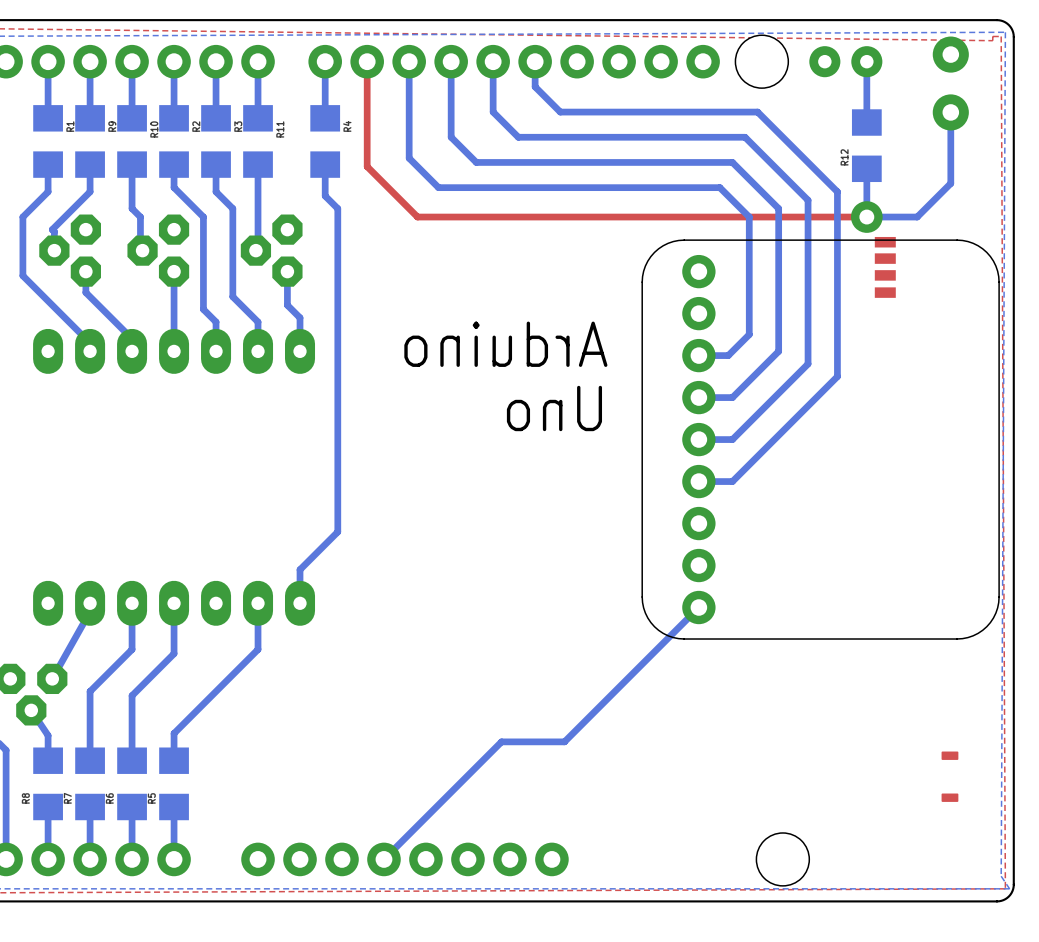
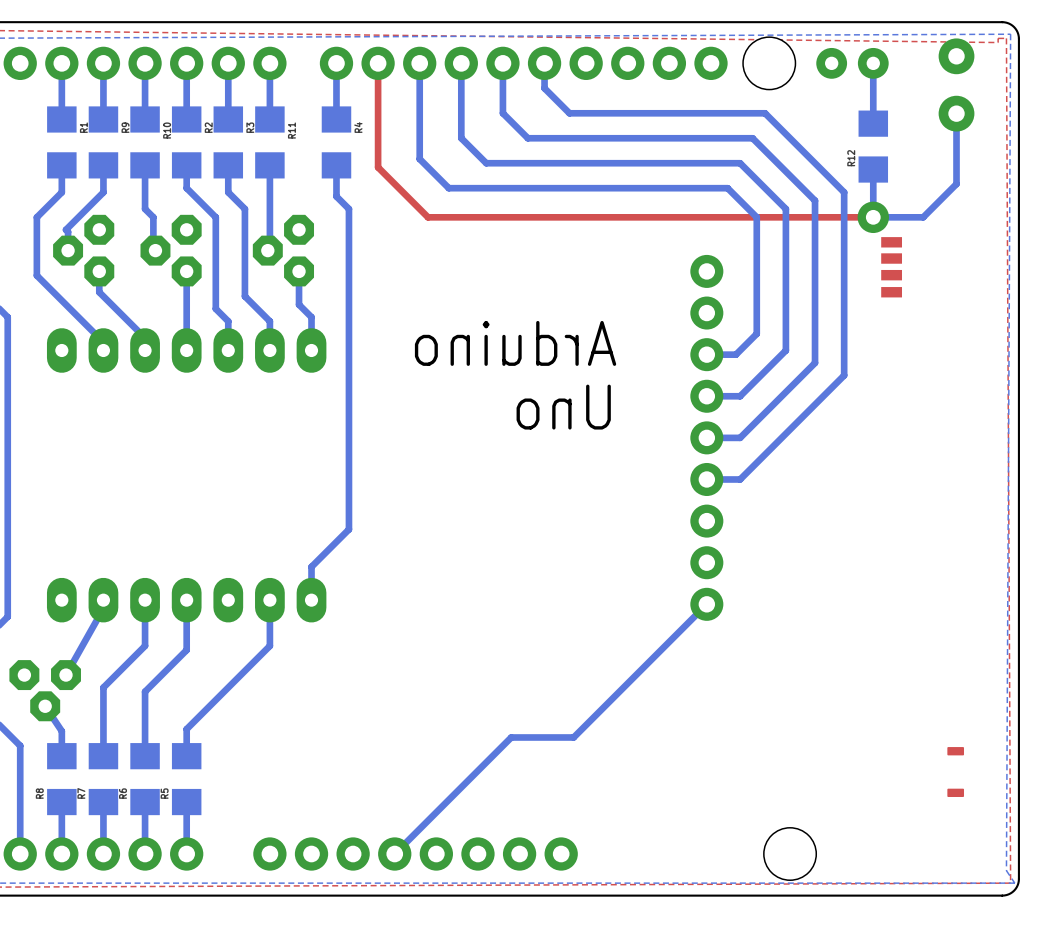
board edge: (957, 240) (684, 240) (668, 243) (650, 256) (643, 271) (642, 282) (642, 597) (645, 613) (658, 630) (673, 637) (684, 639) (957, 639) (973, 635) (990, 622) (997, 607) (999, 597) (998, 276) (995, 266) (986, 252) (973, 243) (957, 240) -> none

